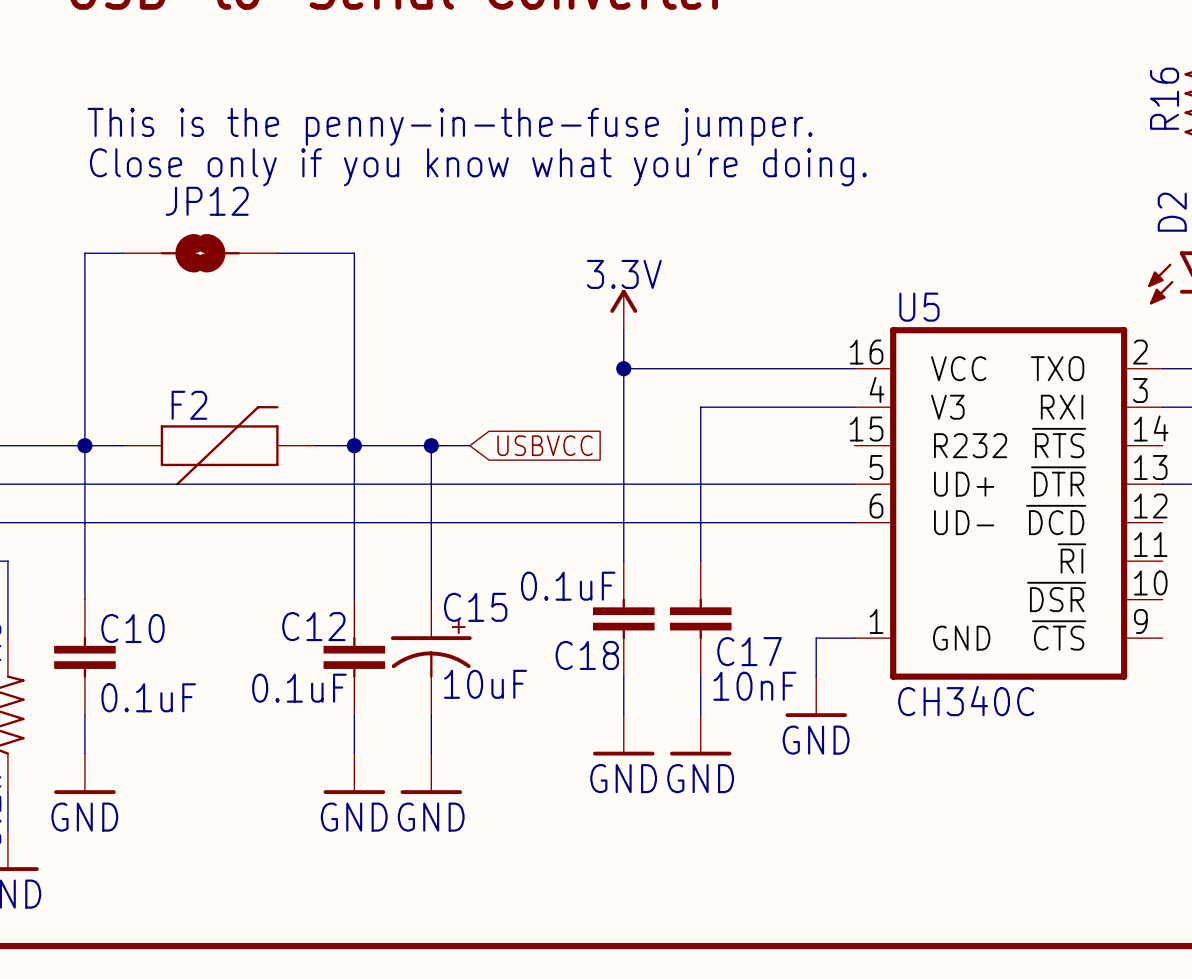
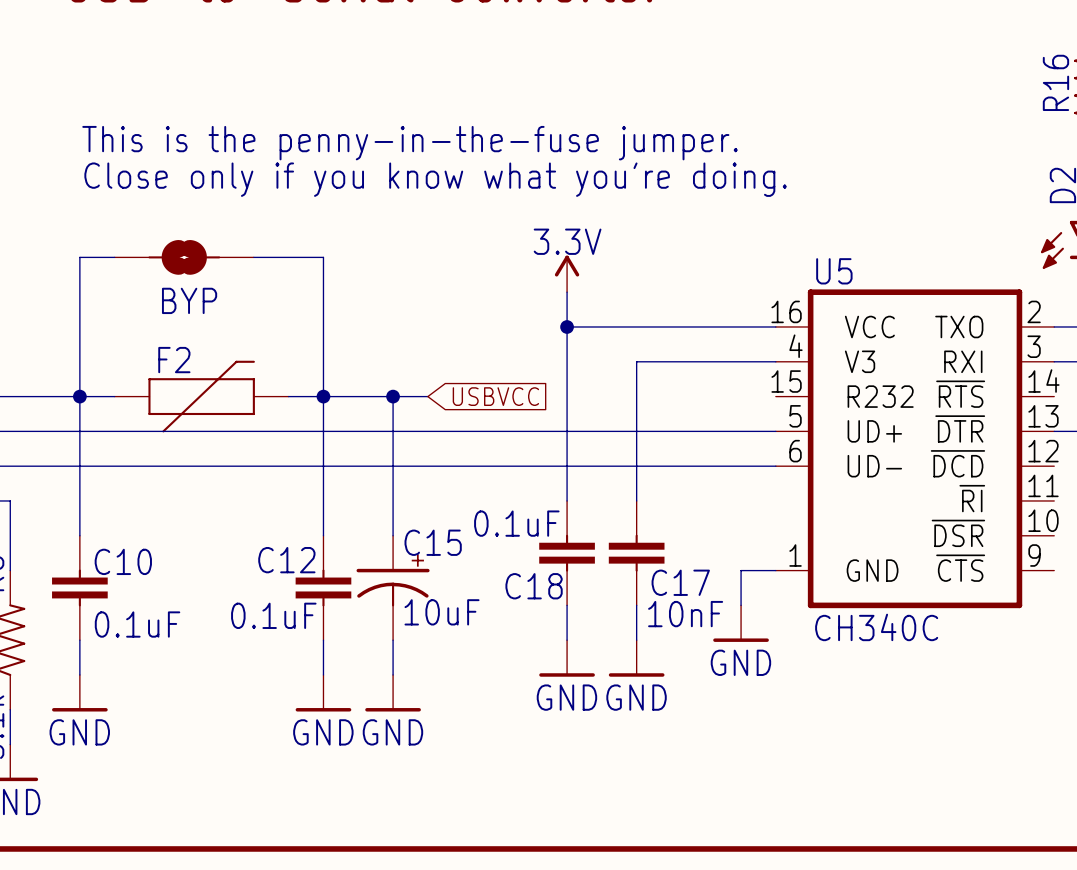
text: This is the penny-in-the-fuse jumper. (450, 126) -> none
text: Close only if you know what you're doing. (478, 167) -> This is the penny-in-the-fuse jumper. (410, 143)
text: none -> Close only if you know what you're doing. (435, 179)
wire: (123, 253) (84, 253) (84, 291) -> (114, 257) (79, 257)
JP12: (200, 253) -> none
wire: (277, 253) (354, 253) (354, 291) -> (253, 257) (323, 257)
BYP: none -> (184, 257)

